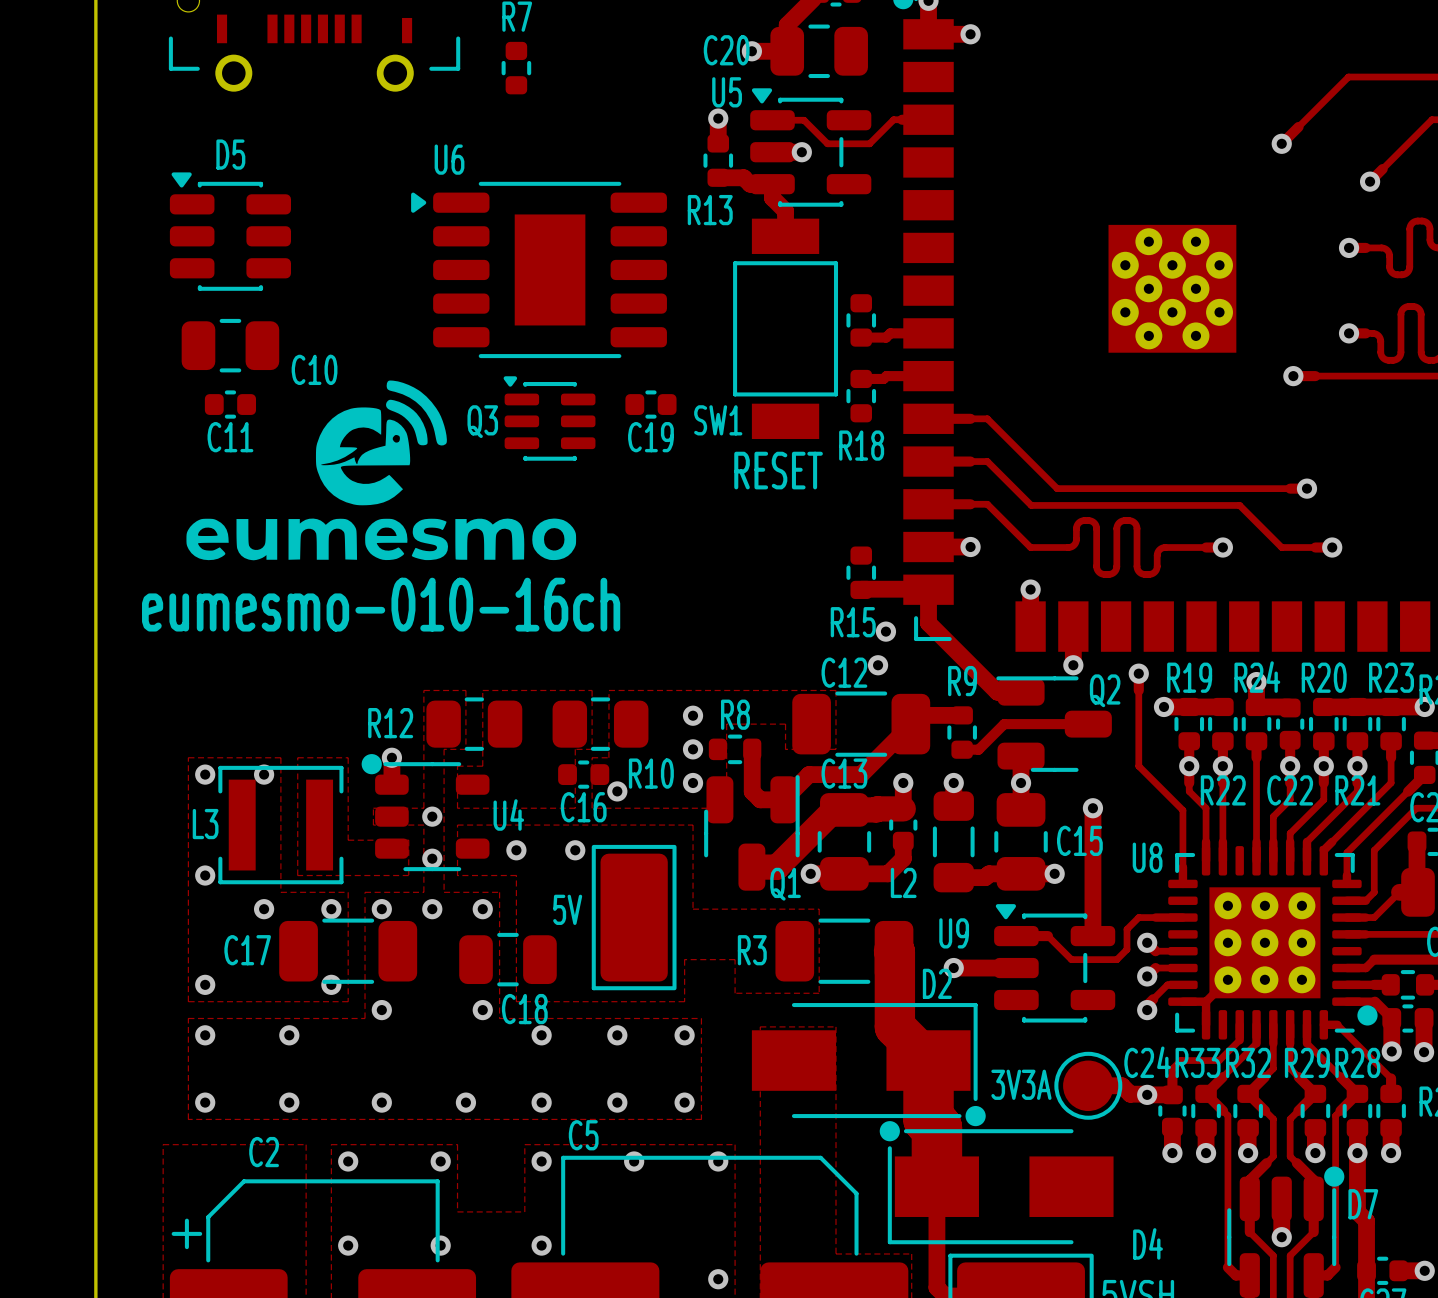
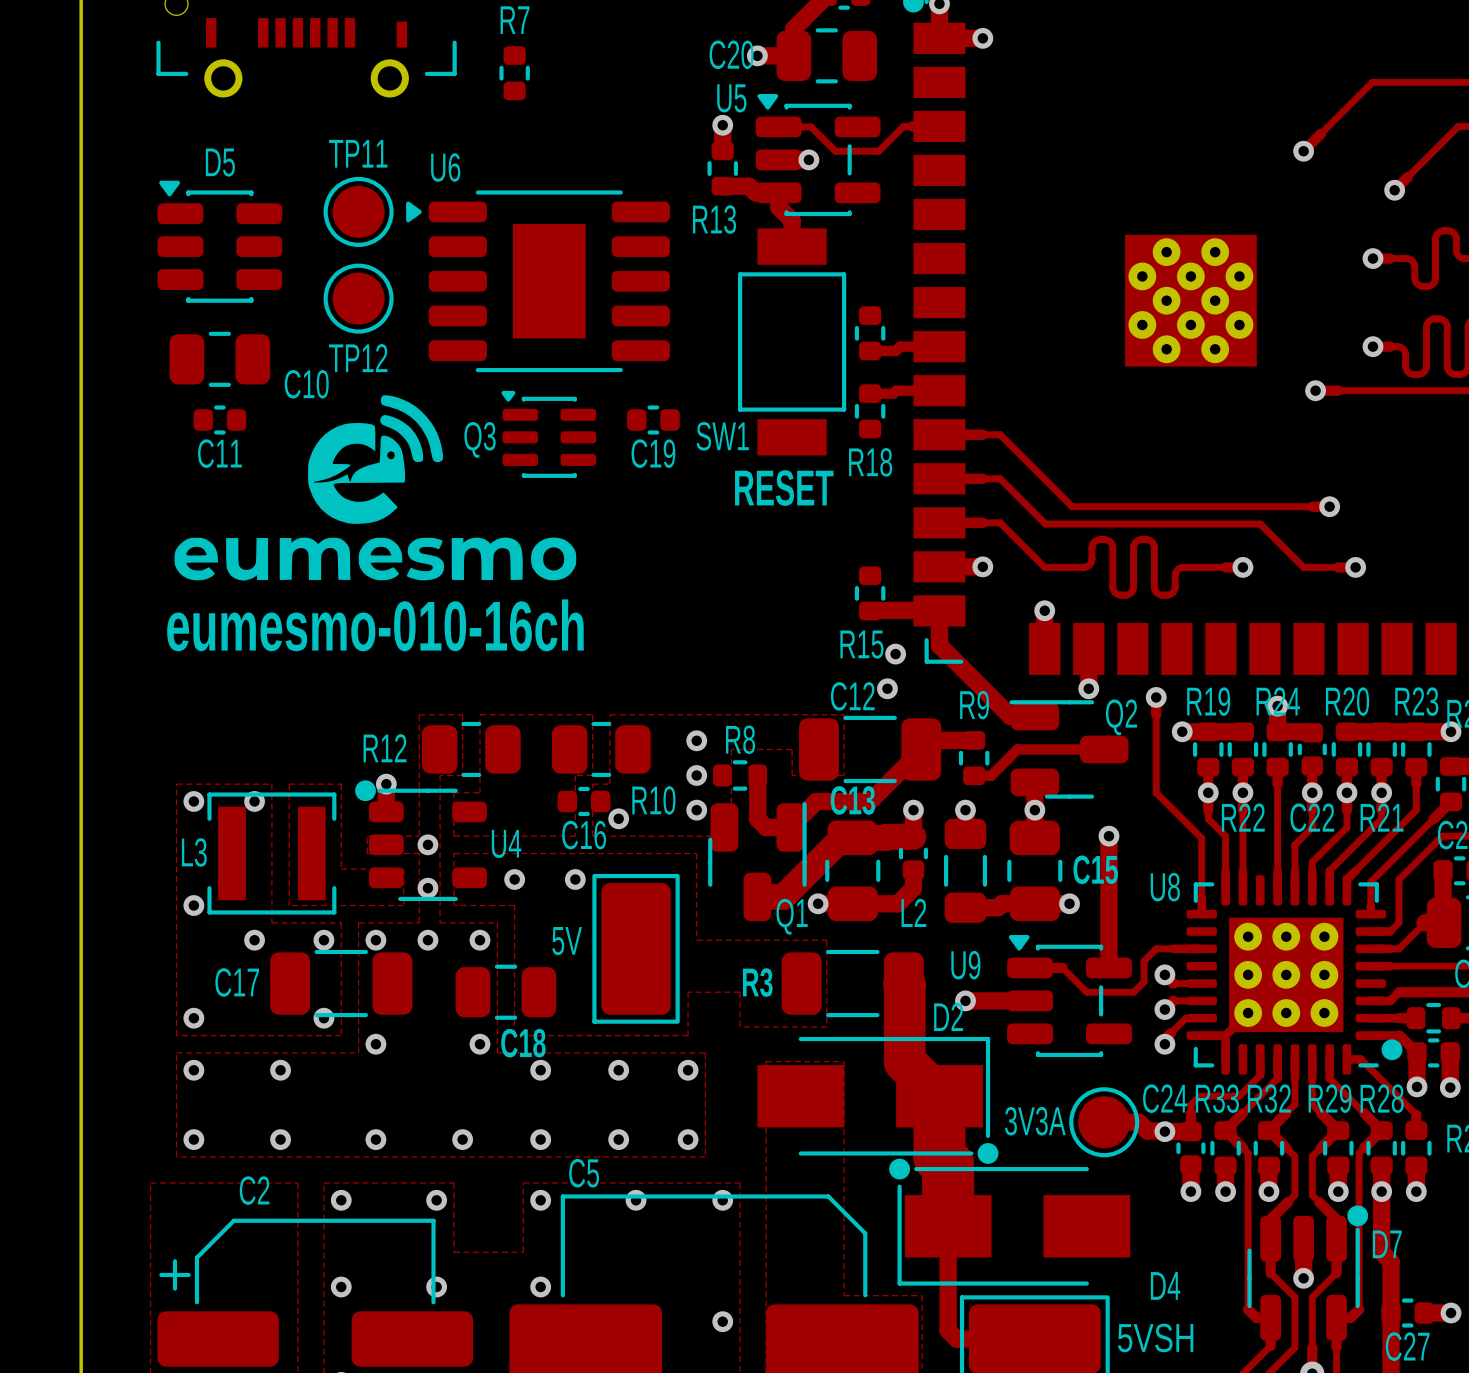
TP11: none -> (358, 211)
TP12: none -> (358, 298)

